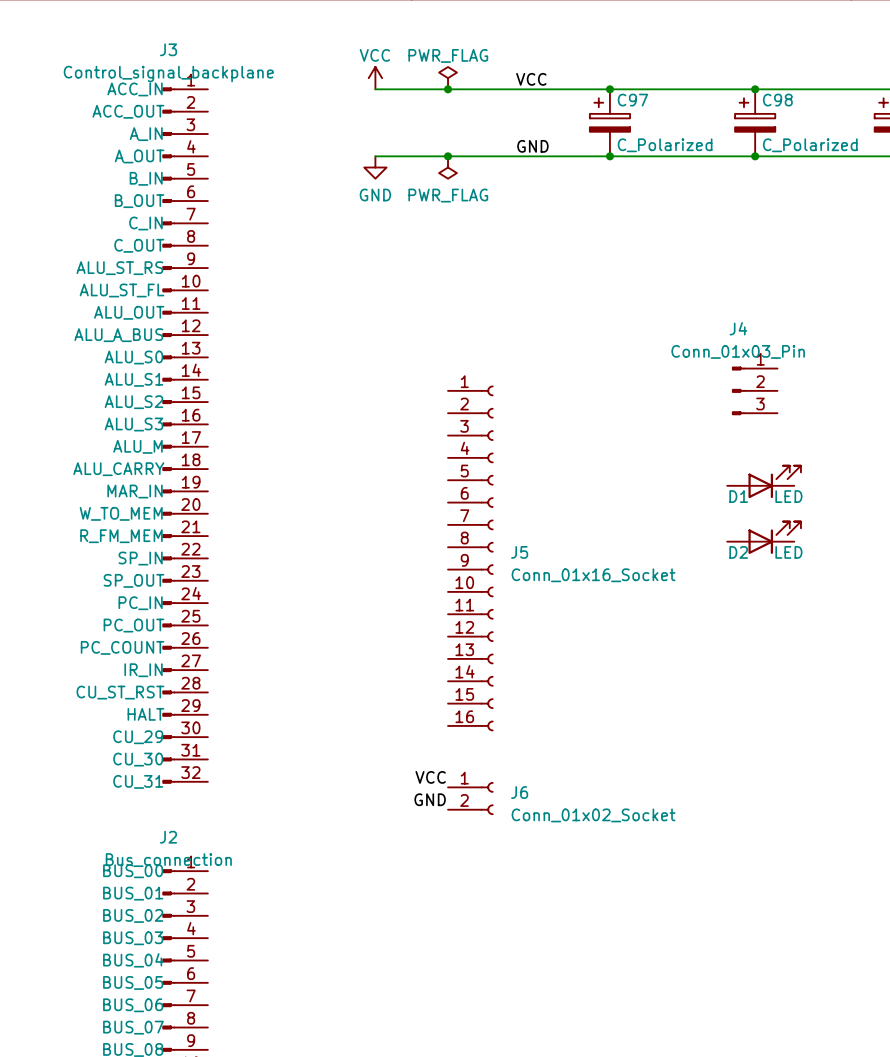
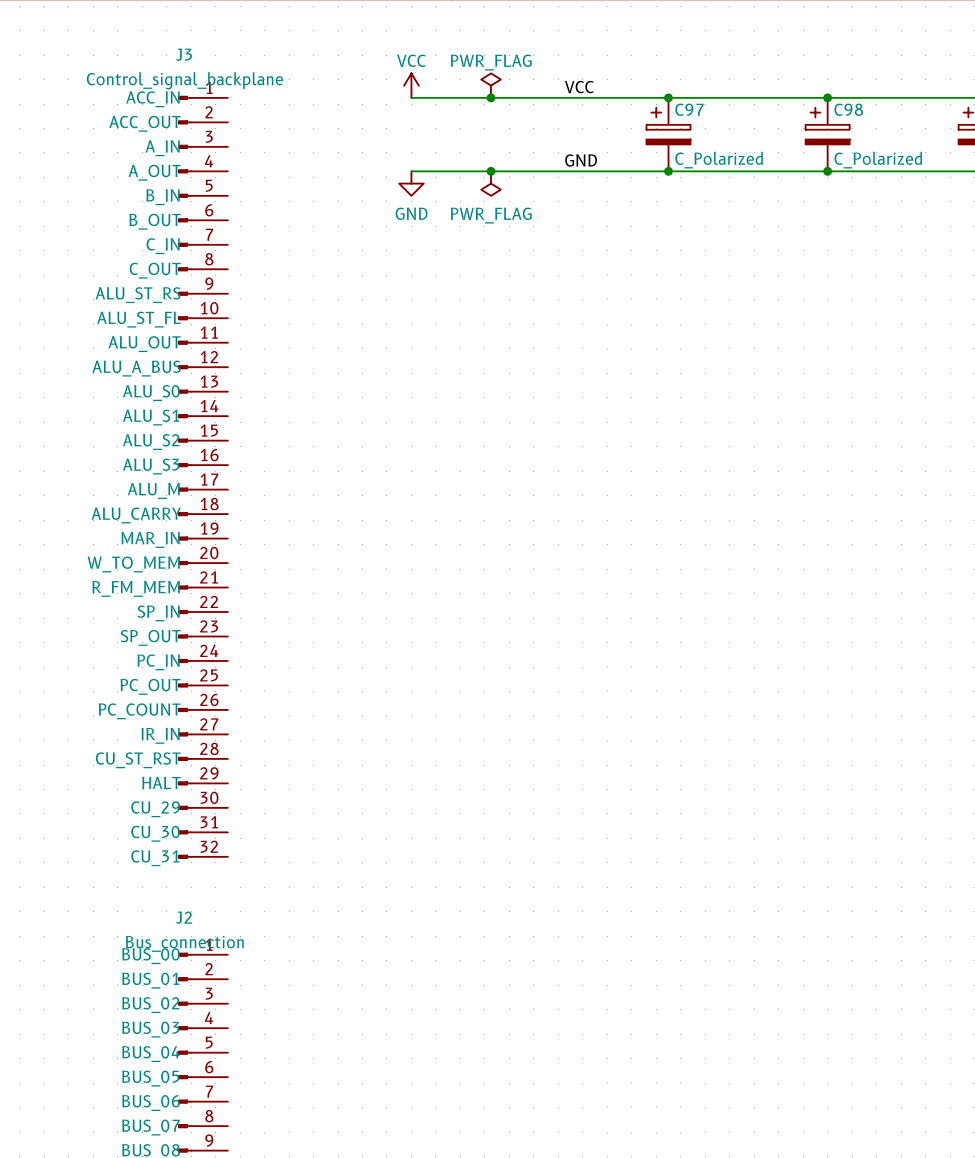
J4: Conn_01x03_Pin (754, 390) -> none
D1: LED (764, 481) -> none
D2: LED (764, 537) -> none
J5: Conn_01x16_Socket (470, 558) -> none
label: VCC (430, 777) -> none
J6: Conn_01x02_Socket (470, 798) -> none
label: GND (430, 799) -> none

